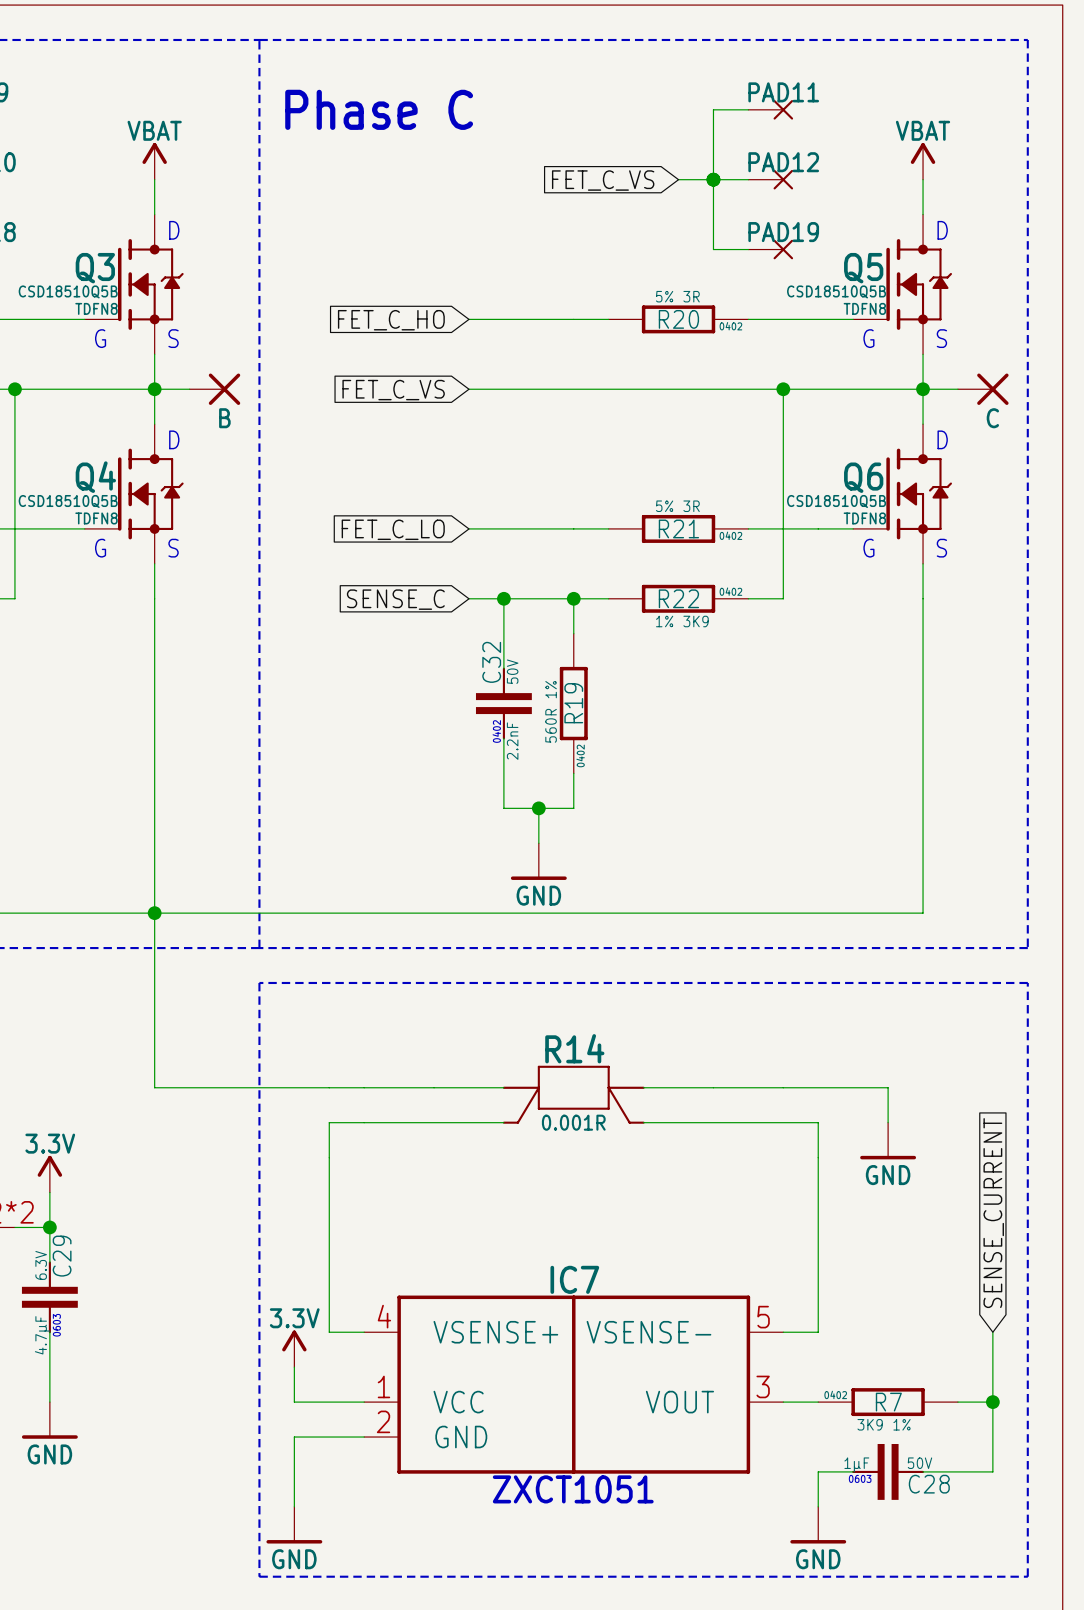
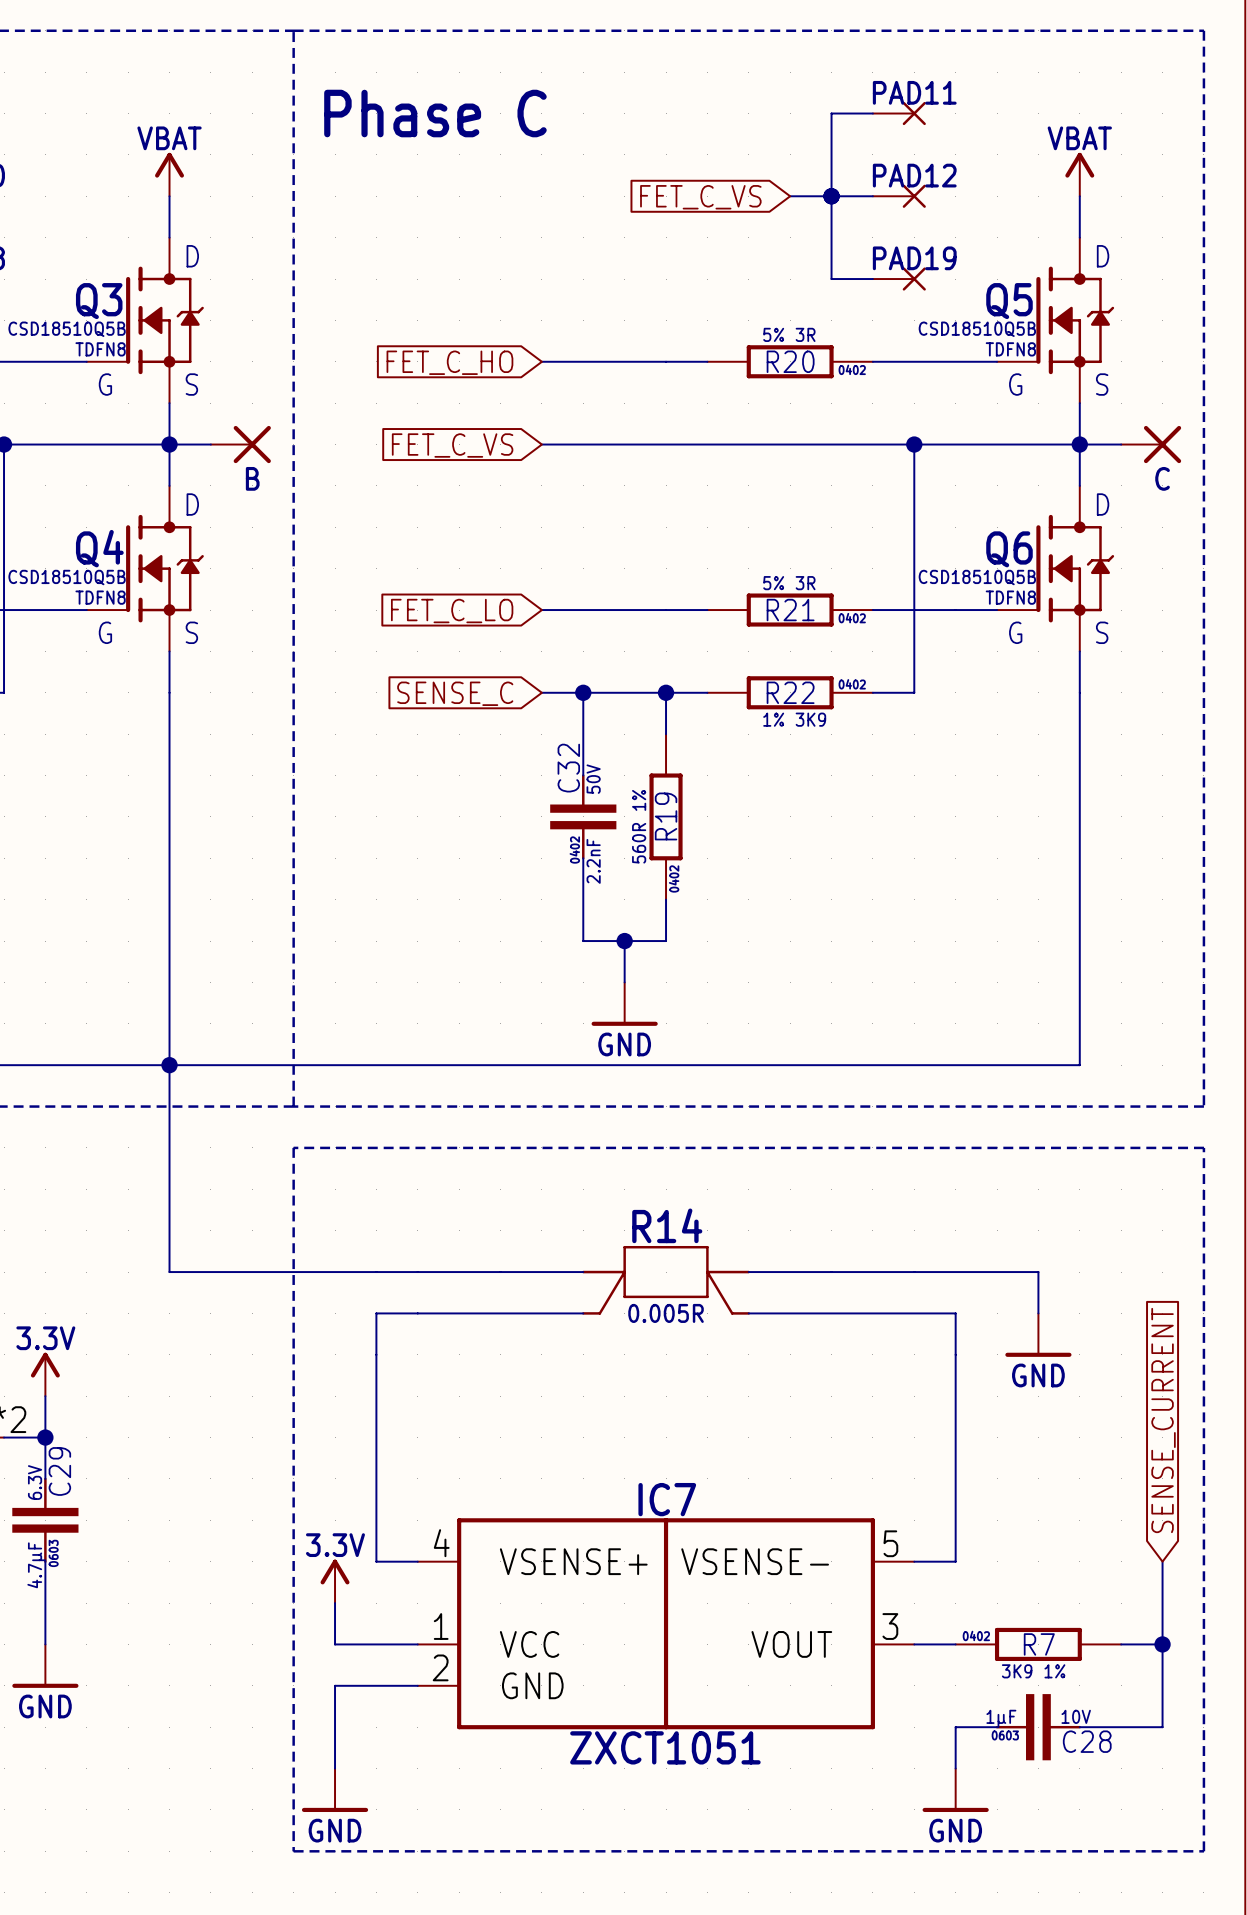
R14 value: 0.001R (573, 1122) -> 0.005R (666, 1313)
C28 text: 50V (919, 1463) -> 10V (1076, 1716)

